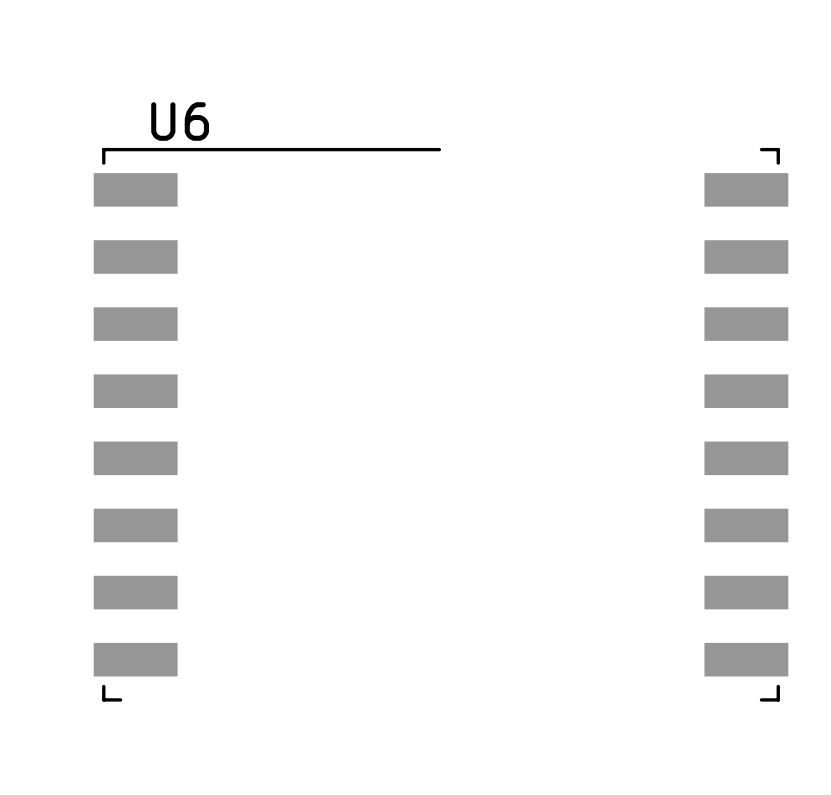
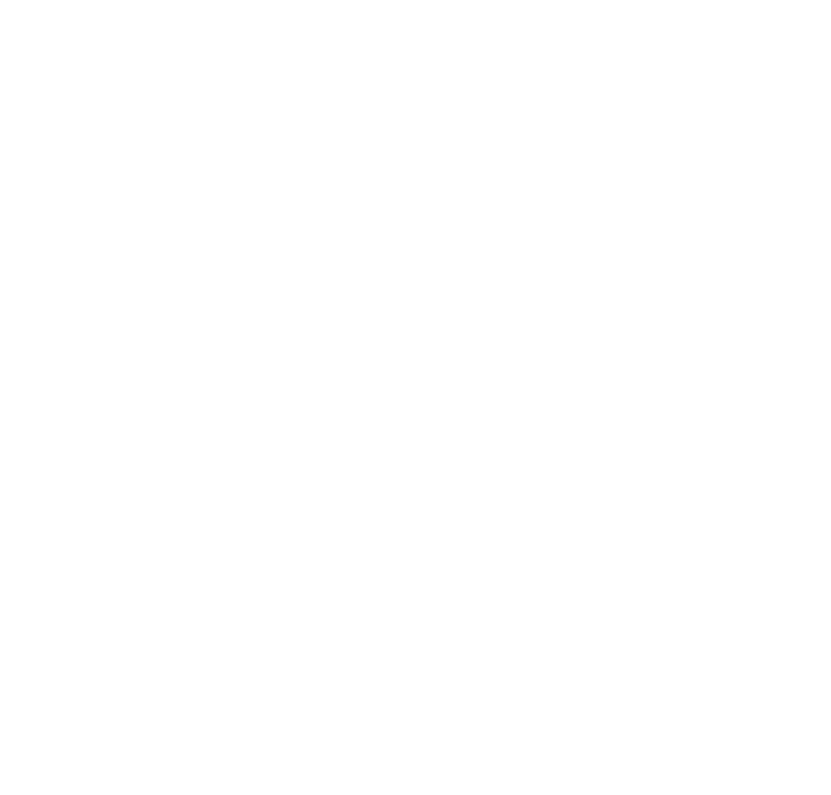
U6: (441, 424) -> none

